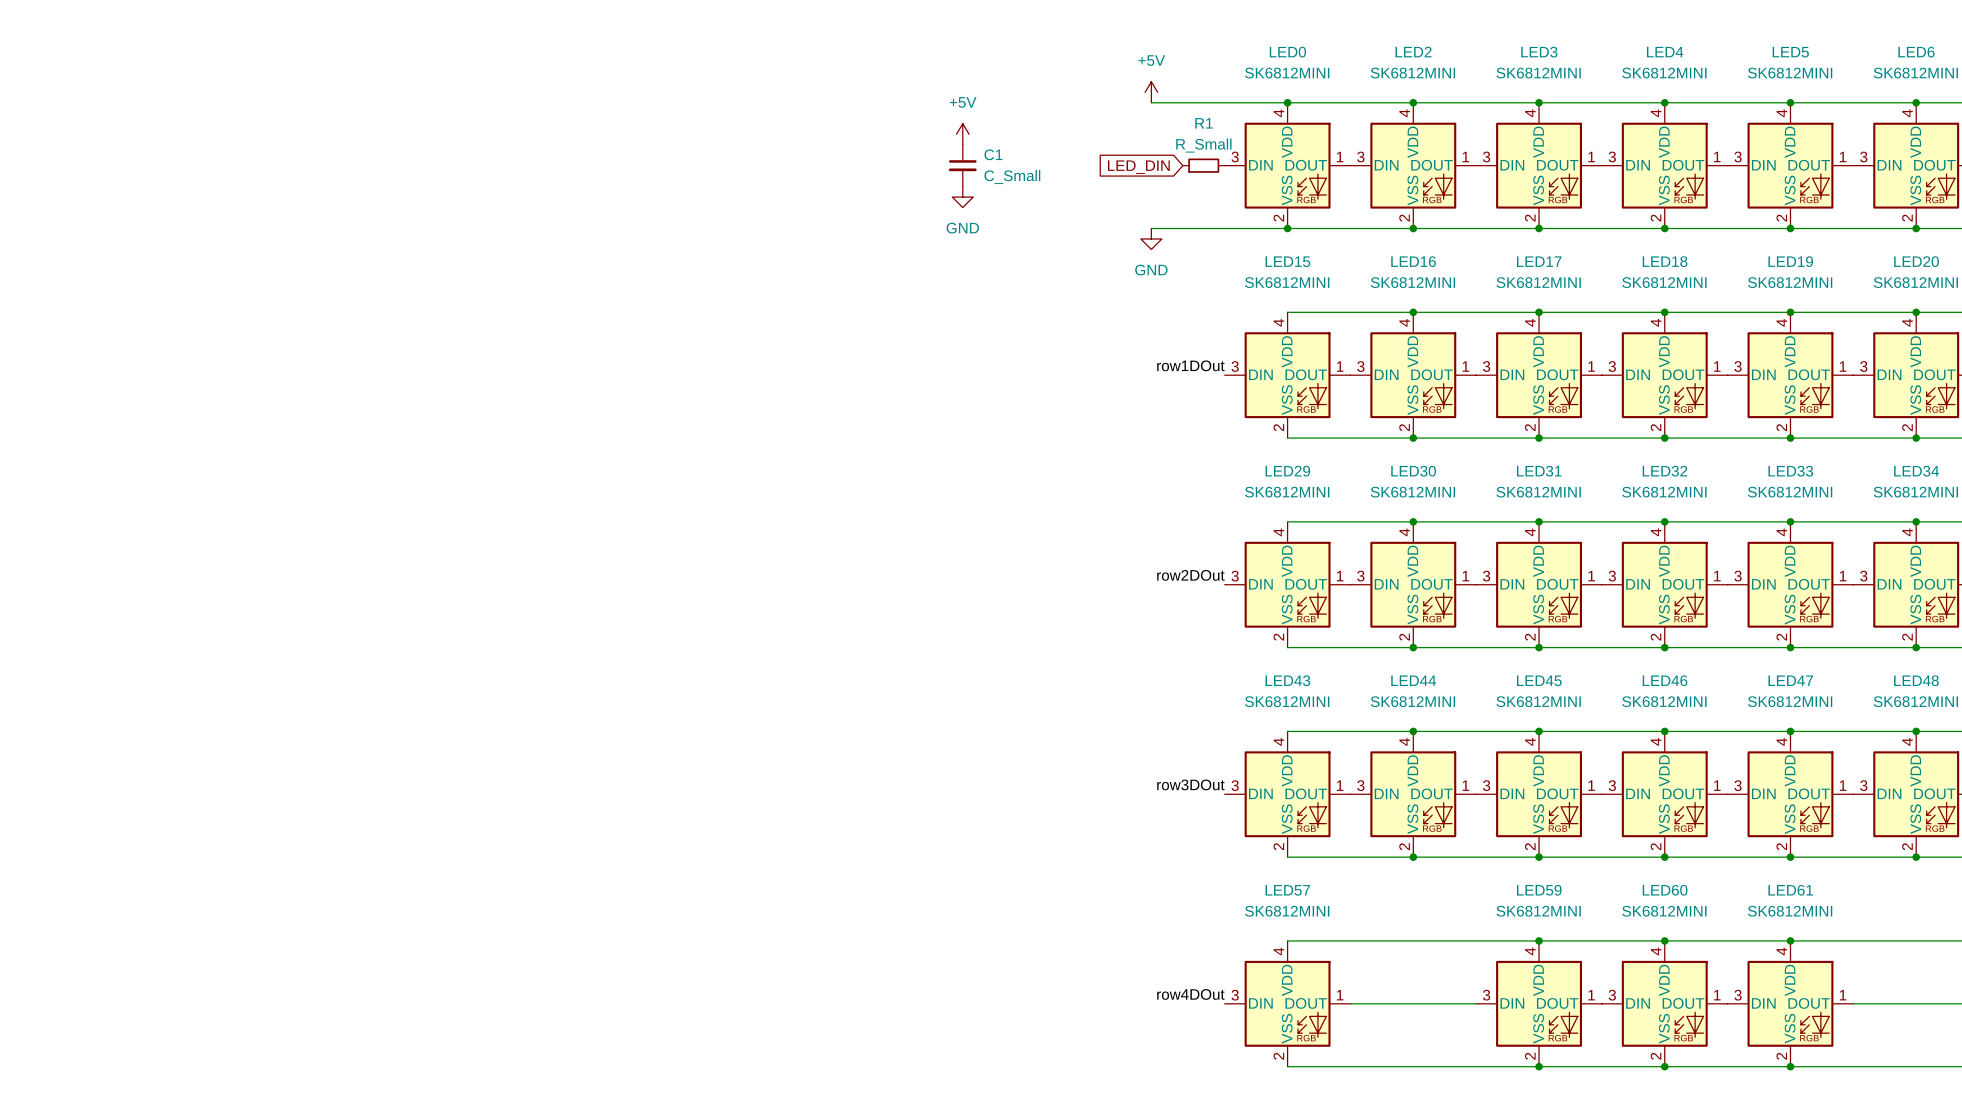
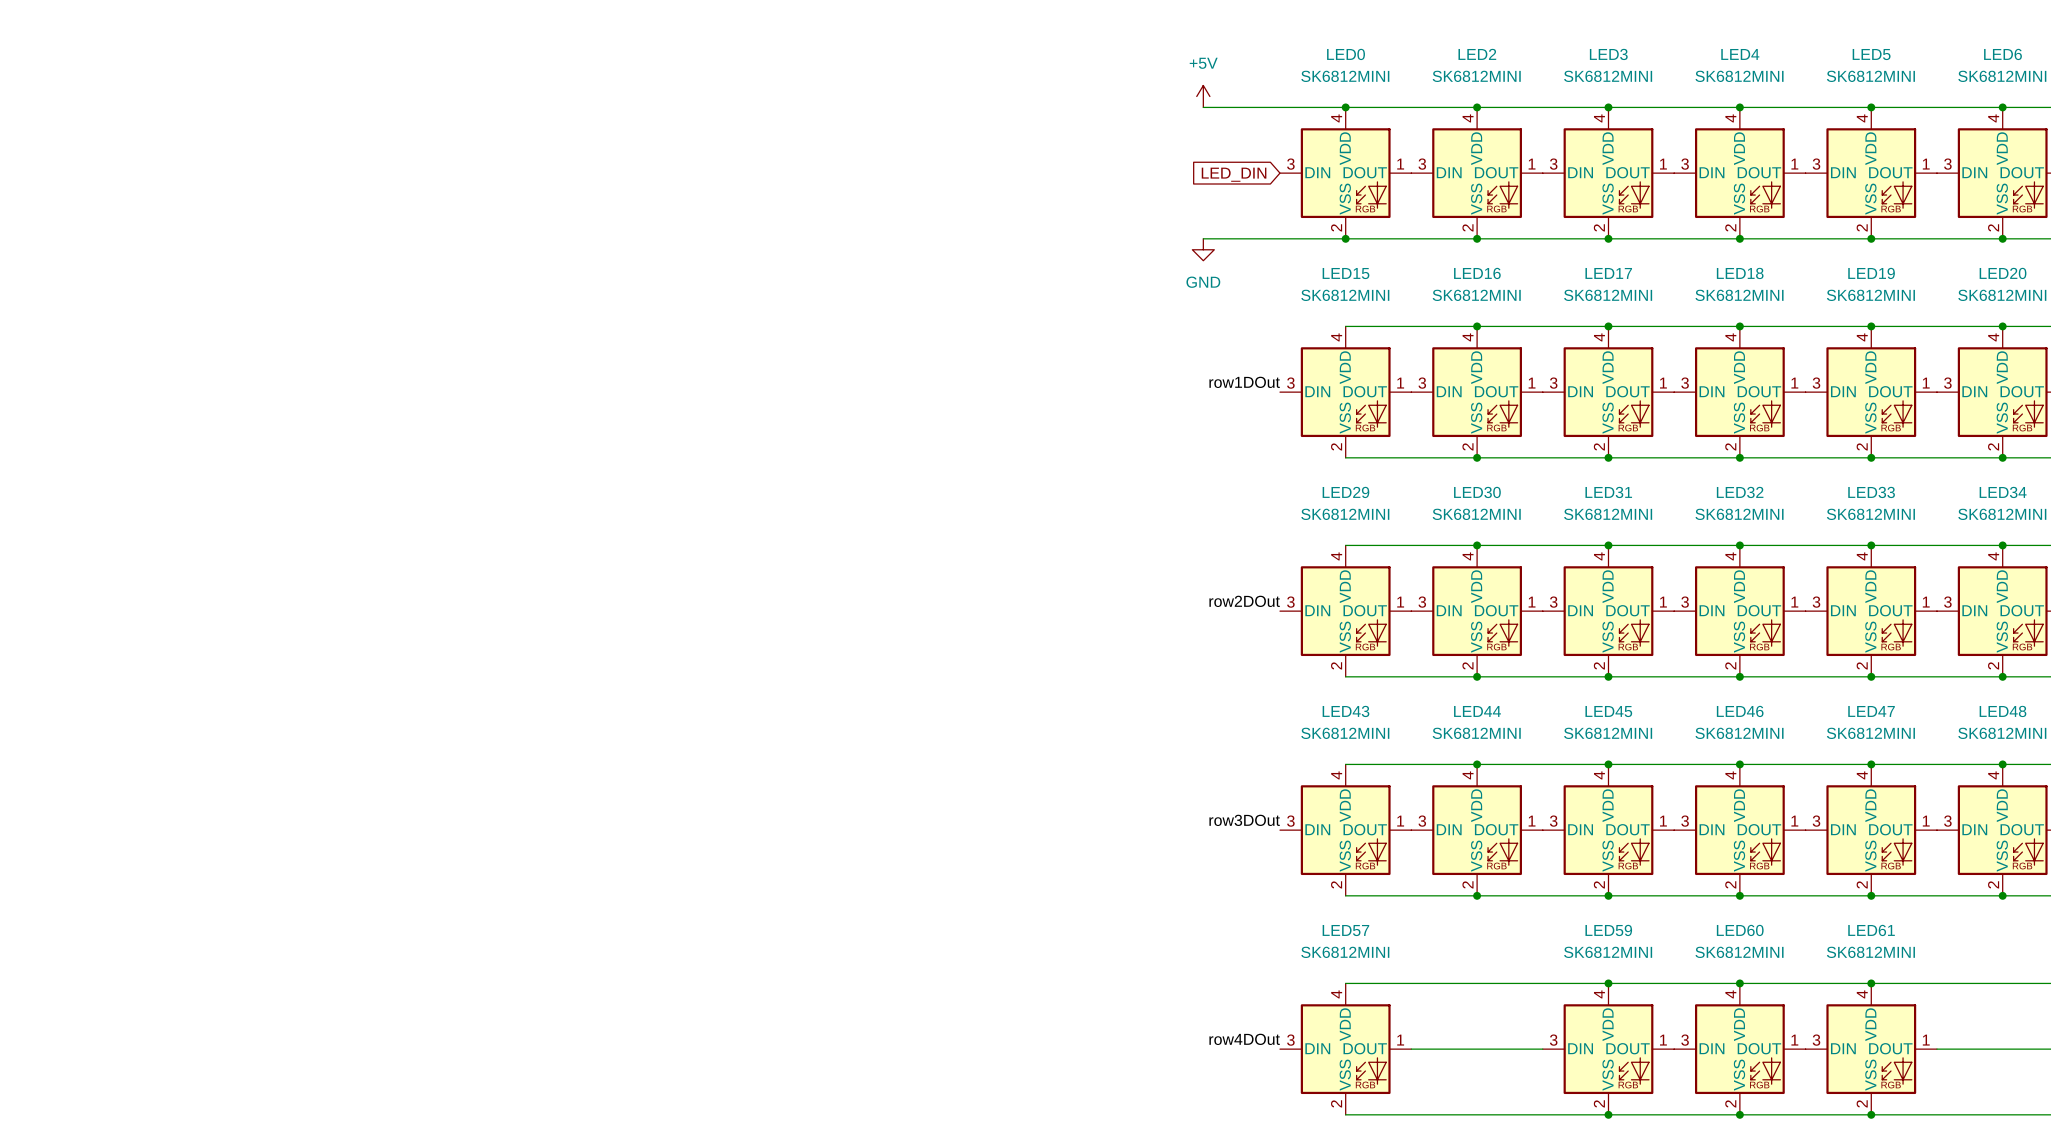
power symbol: +5V (962, 134) -> none
C1: C_Small (962, 165) -> none
R1: R_Small (1203, 165) -> none
global label position: LED_DIN (1138, 167) -> LED_DIN (1234, 174)
power symbol: GND (962, 197) -> none

